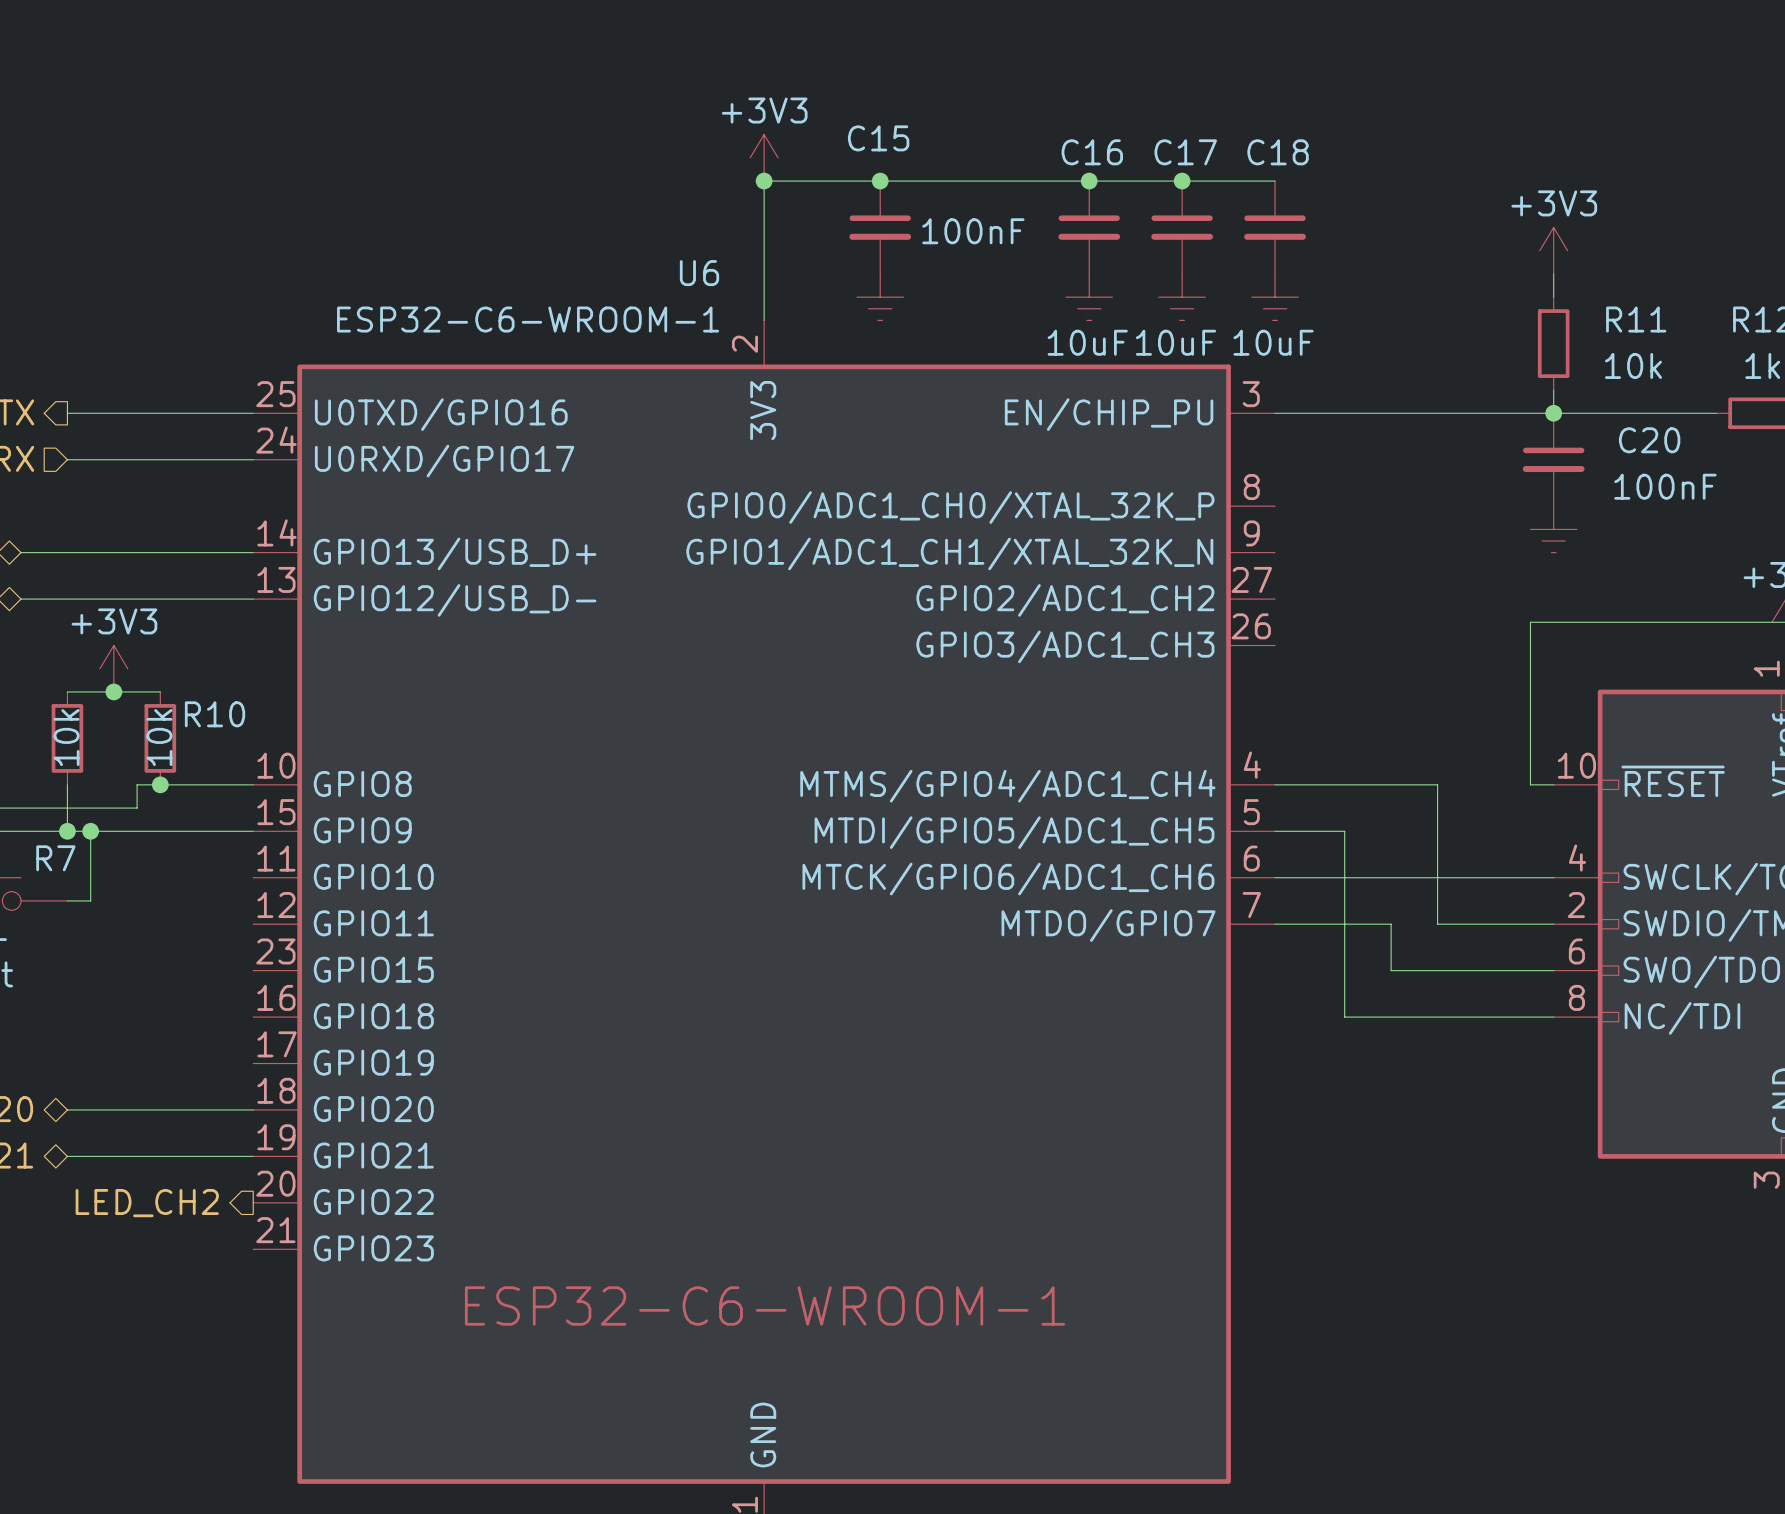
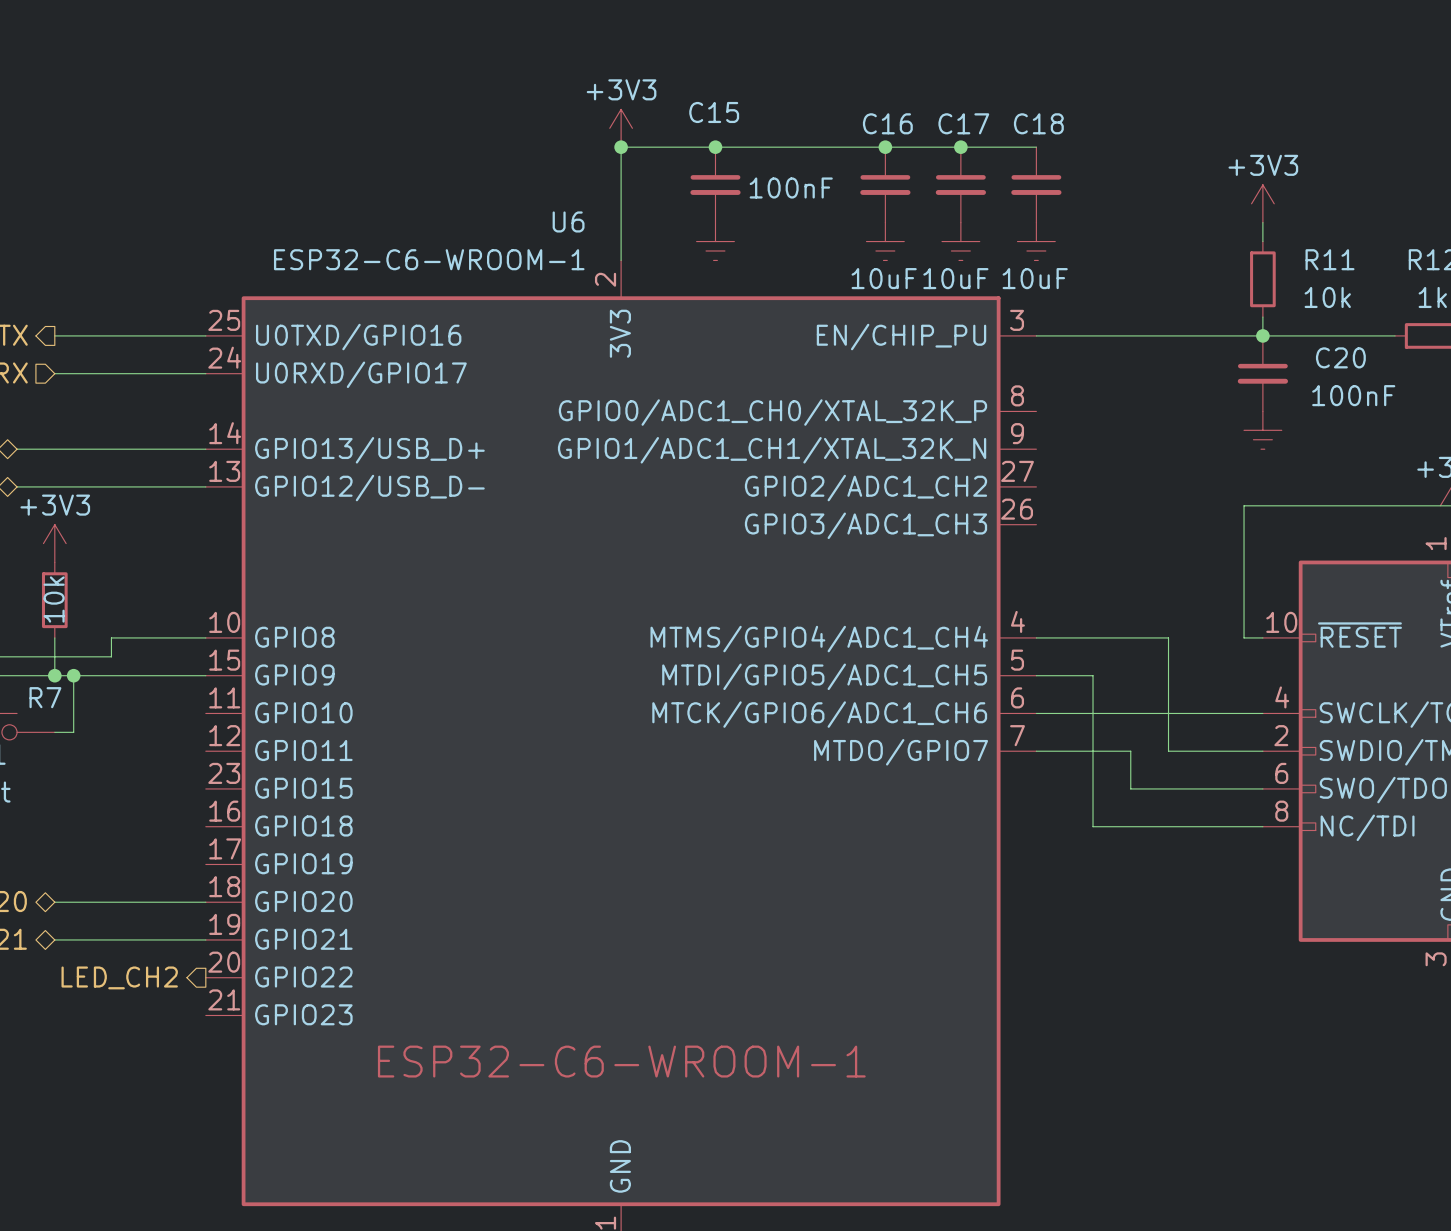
power symbol position: +3V3 (113, 668) -> +3V3 (54, 543)
wire: (67, 691) (160, 691) -> none
junction: (113, 691) -> none
R10: 10k (160, 738) -> none
junction: (160, 784) -> none

